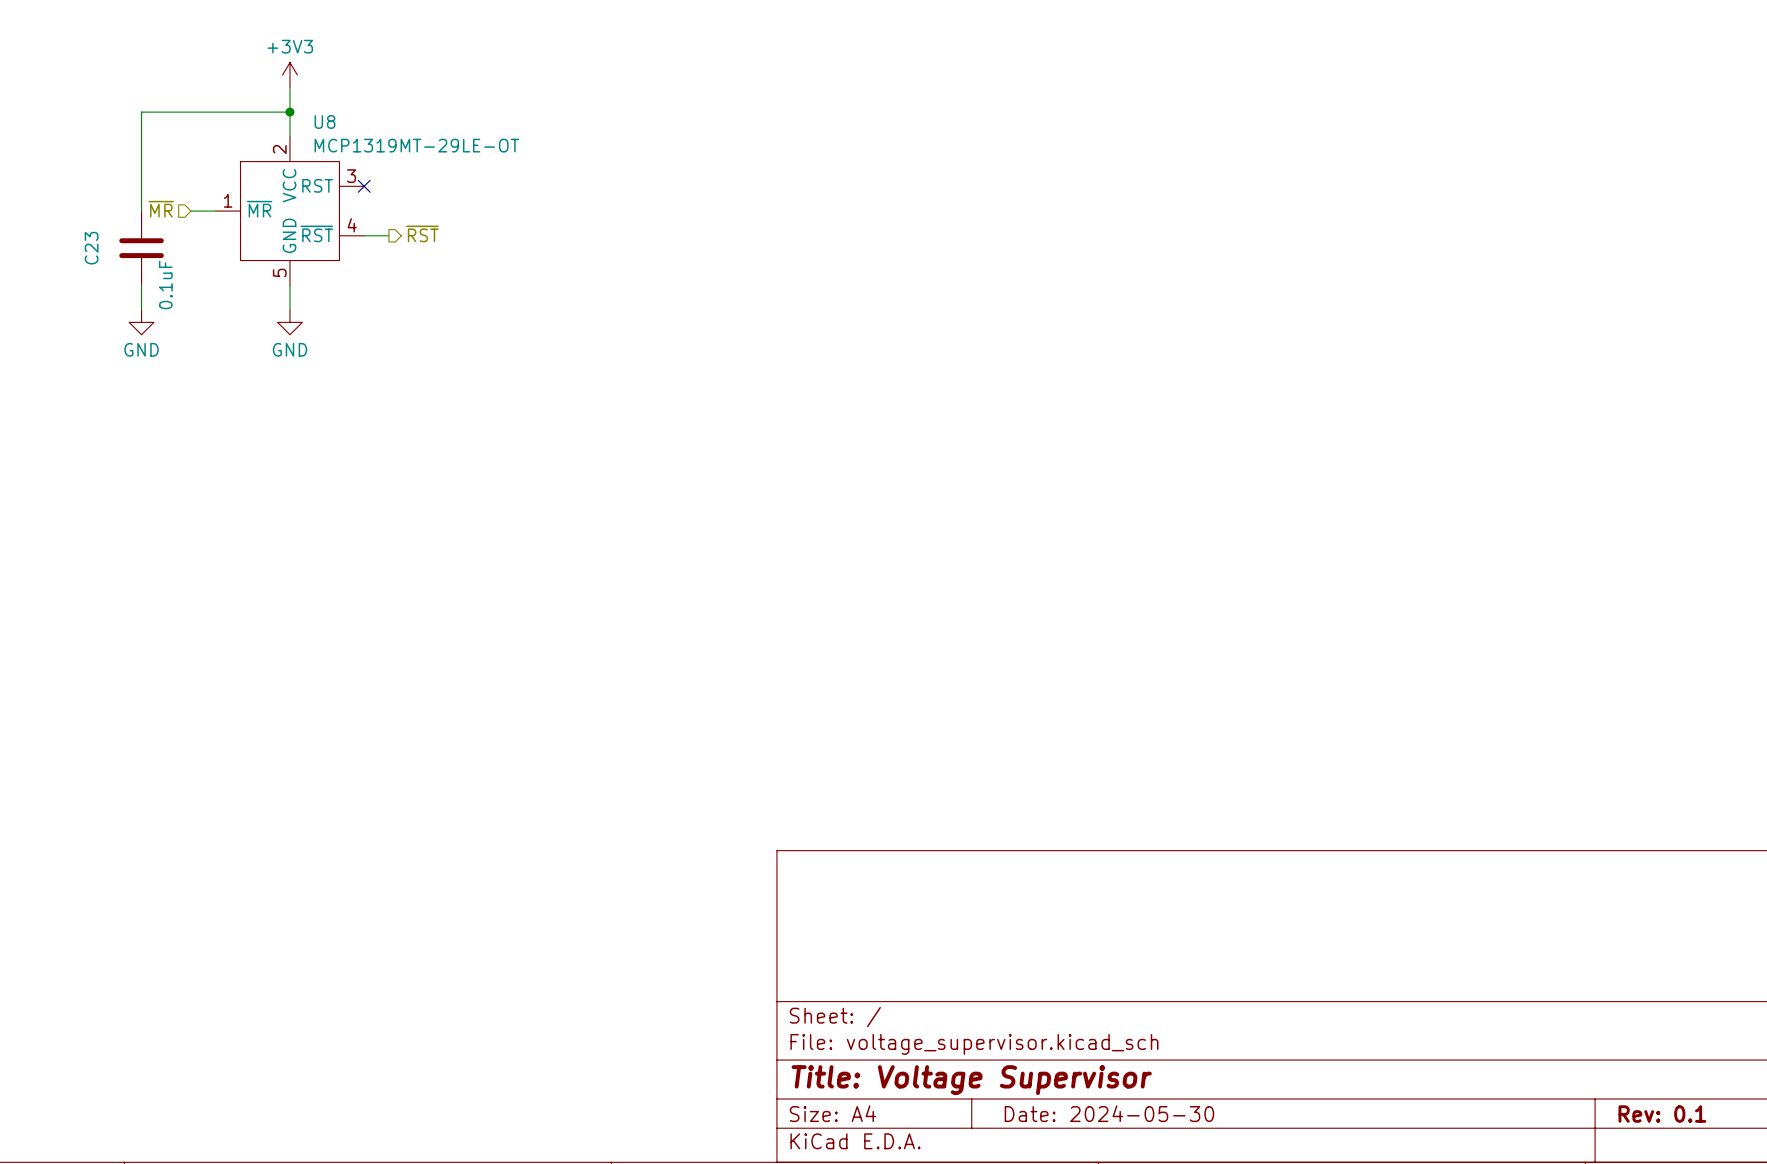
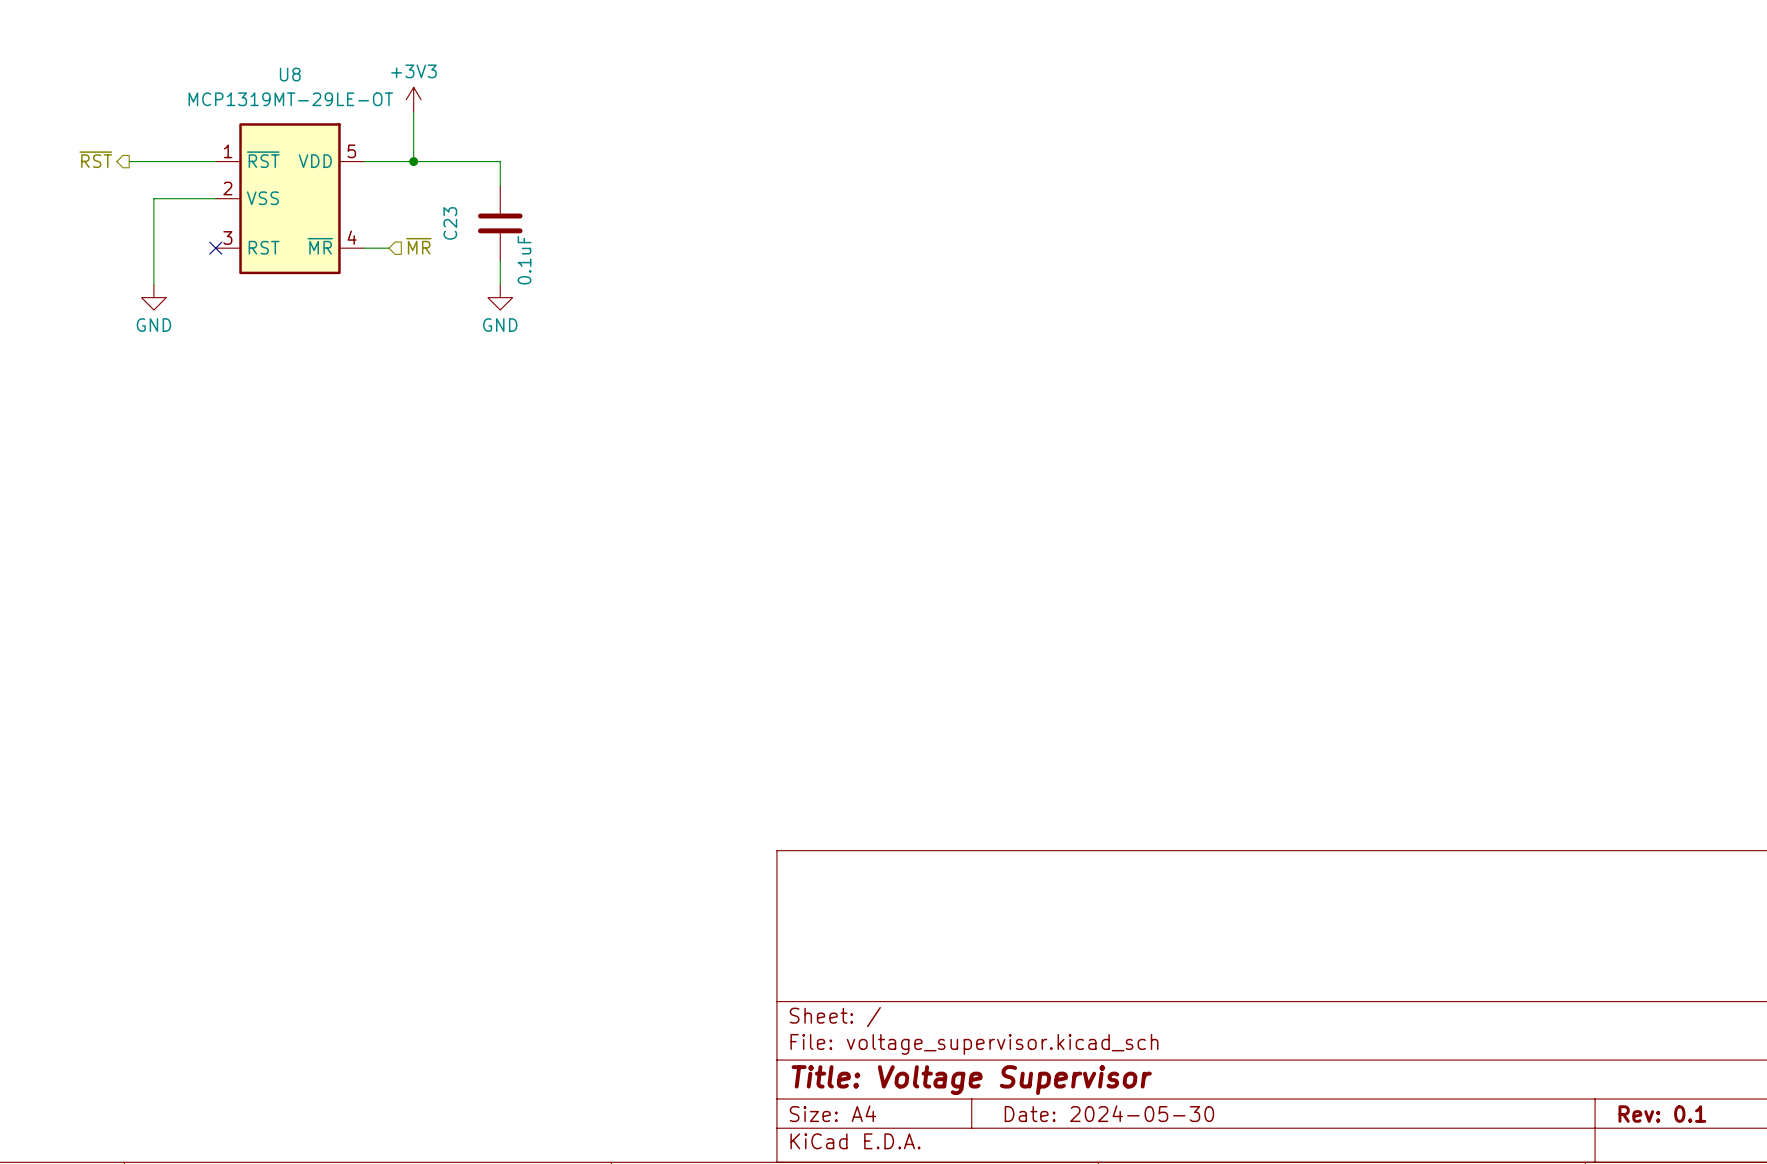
power symbol position: +3V3 (289, 75) -> +3V3 (413, 99)
wire: (289, 87) (289, 136) -> (413, 112) (413, 161)
wire: (289, 112) (141, 112) (141, 211) -> none
junction: (289, 112) -> none
U8 name position: U8 (324, 121) -> U8 (290, 74)
U8 symbol: [215, 136, 365, 286] -> [215, 123, 365, 275]
U8 value position: MCP1319MT-29LE-OT (416, 145) -> MCP1319MT-29LE-OT (290, 99)
hierarchical label: none -> ~{RST} (95, 159)
wire: none -> (129, 161) (215, 161)
wire: none -> (364, 161) (500, 161) (500, 186)
junction: none -> (413, 161)
no-connect mark: (364, 186) -> none
wire: none -> (215, 198) (153, 198) (153, 285)
hierarchical label rotation: 0° (161, 209) -> 180° (418, 246)
hierarchical label position: ~{MR} (161, 209) -> ~{MR} (418, 246)
wire: (191, 211) (215, 211) -> none
hierarchical label: ~{RST} (422, 233) -> none
wire: (364, 235) (388, 235) -> (364, 248) (388, 248)
C23 position: (141, 248) -> (500, 223)
no-connect mark: none -> (215, 248)
wire: (141, 285) (141, 310) -> none
wire: (289, 285) (289, 310) -> (500, 260) (500, 285)
power symbol: none -> GND (500, 297)
power symbol position: GND (141, 322) -> GND (153, 297)
power symbol: GND (289, 322) -> none

